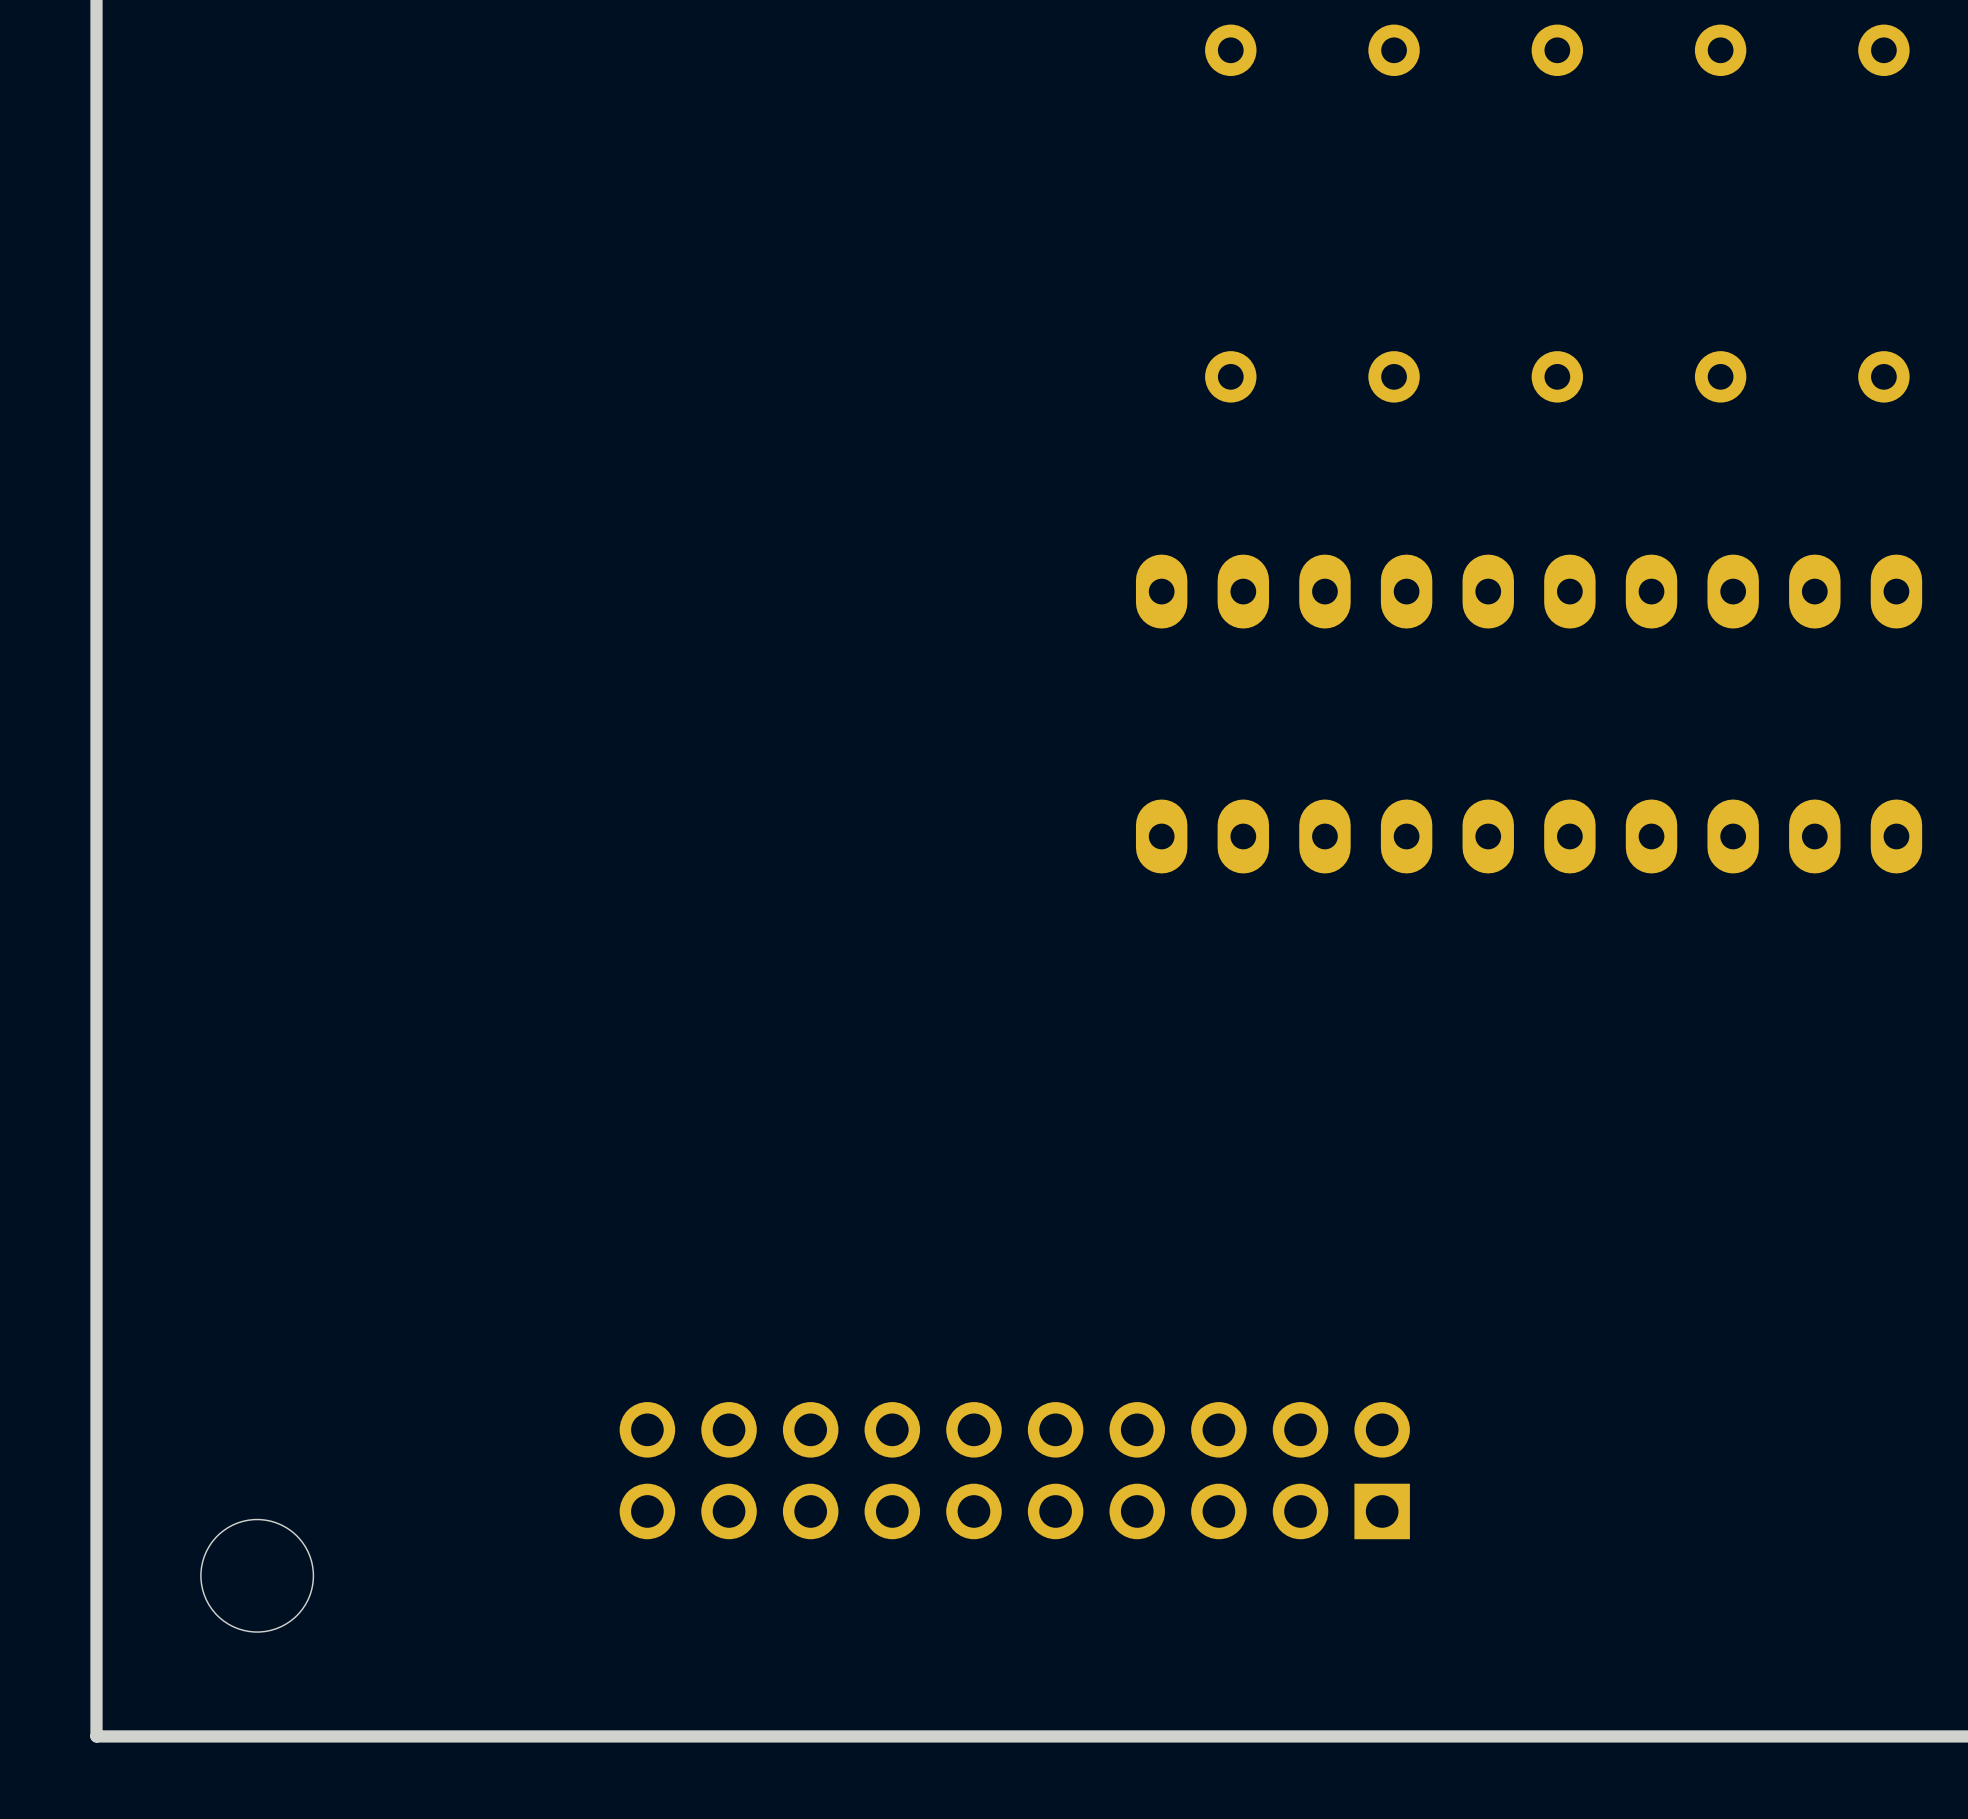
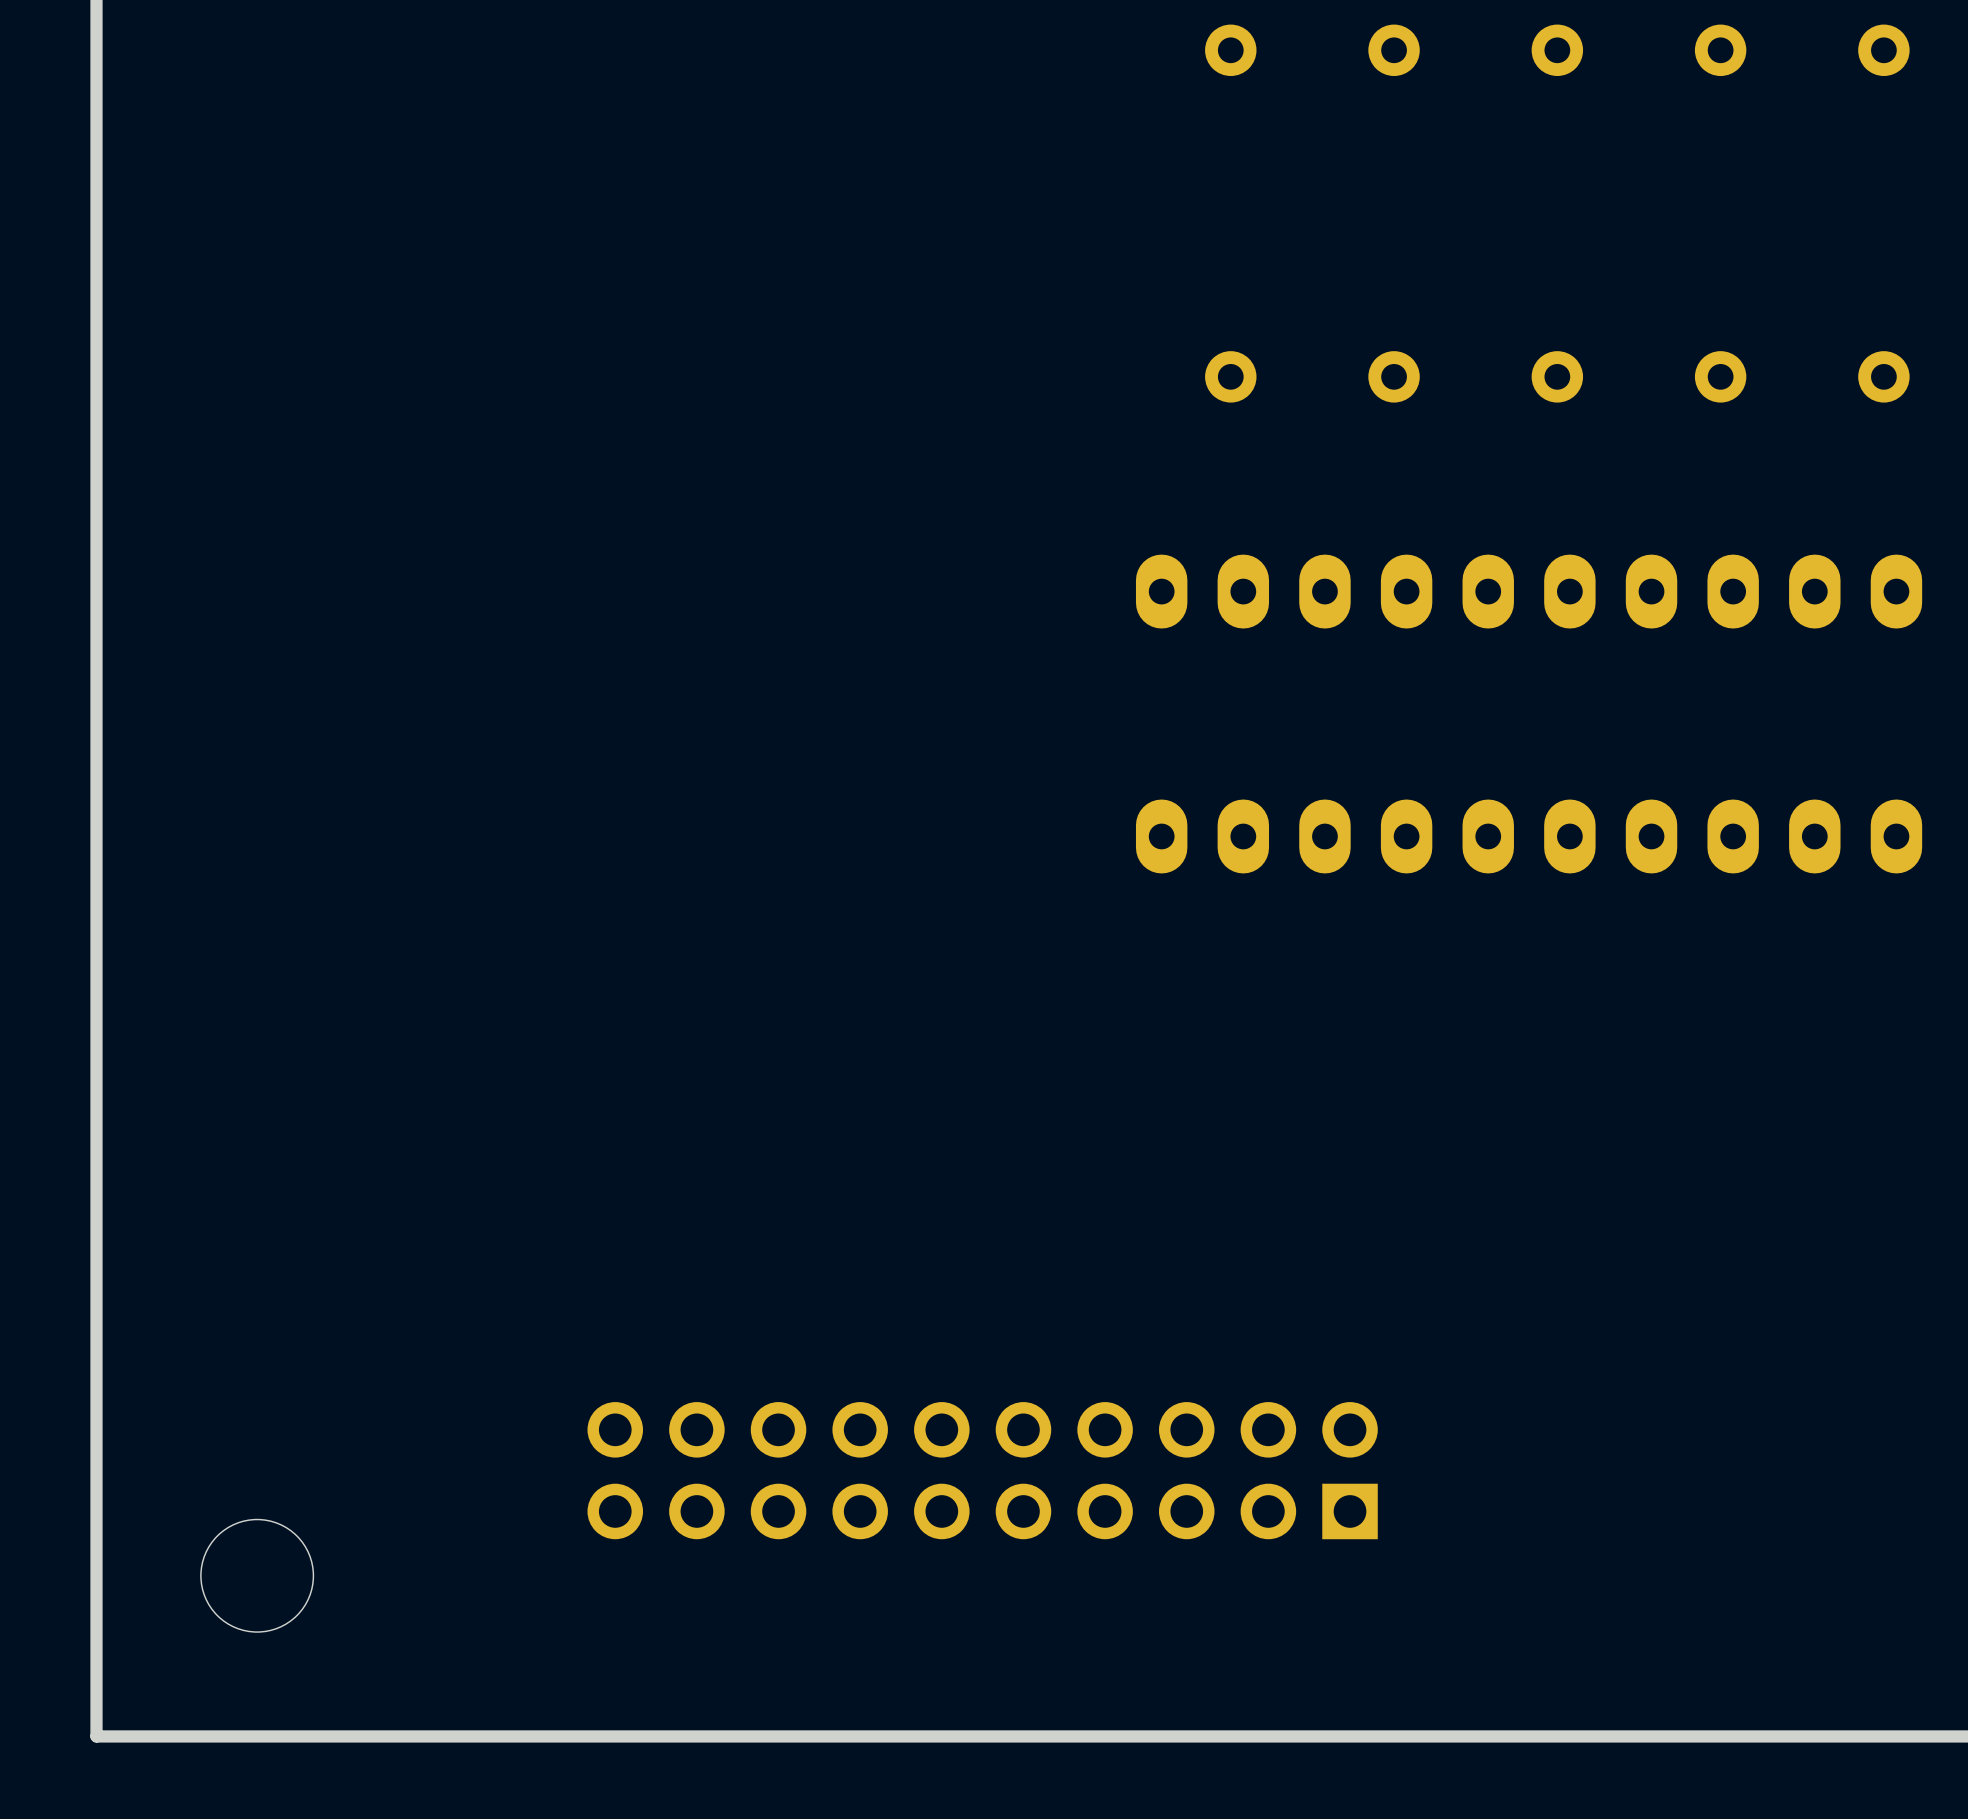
part position: (1014, 1470) -> (982, 1470)

